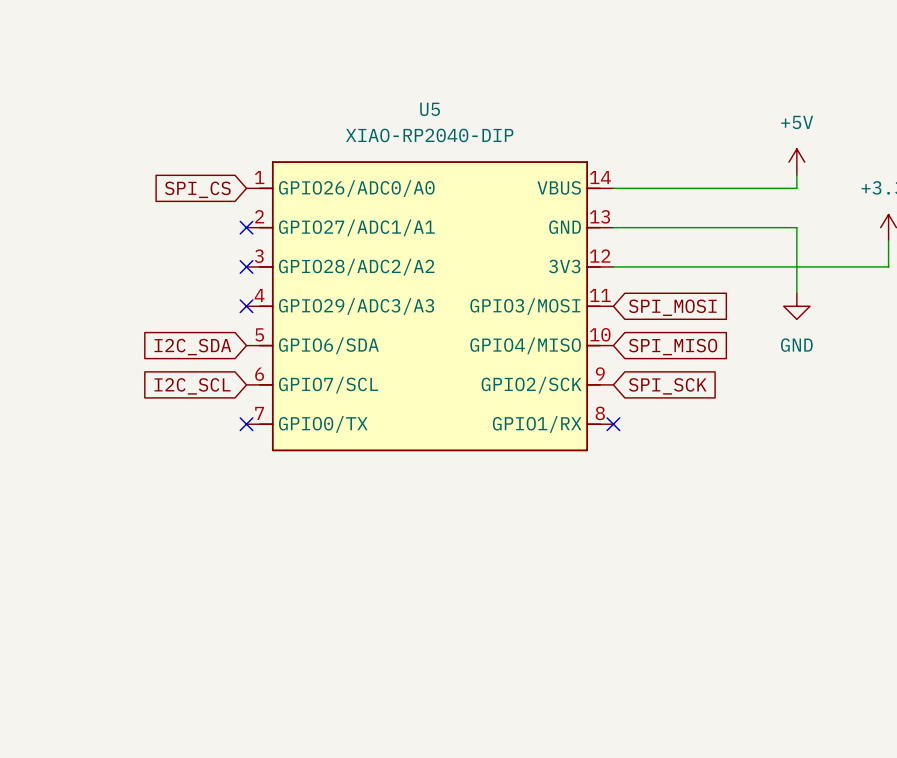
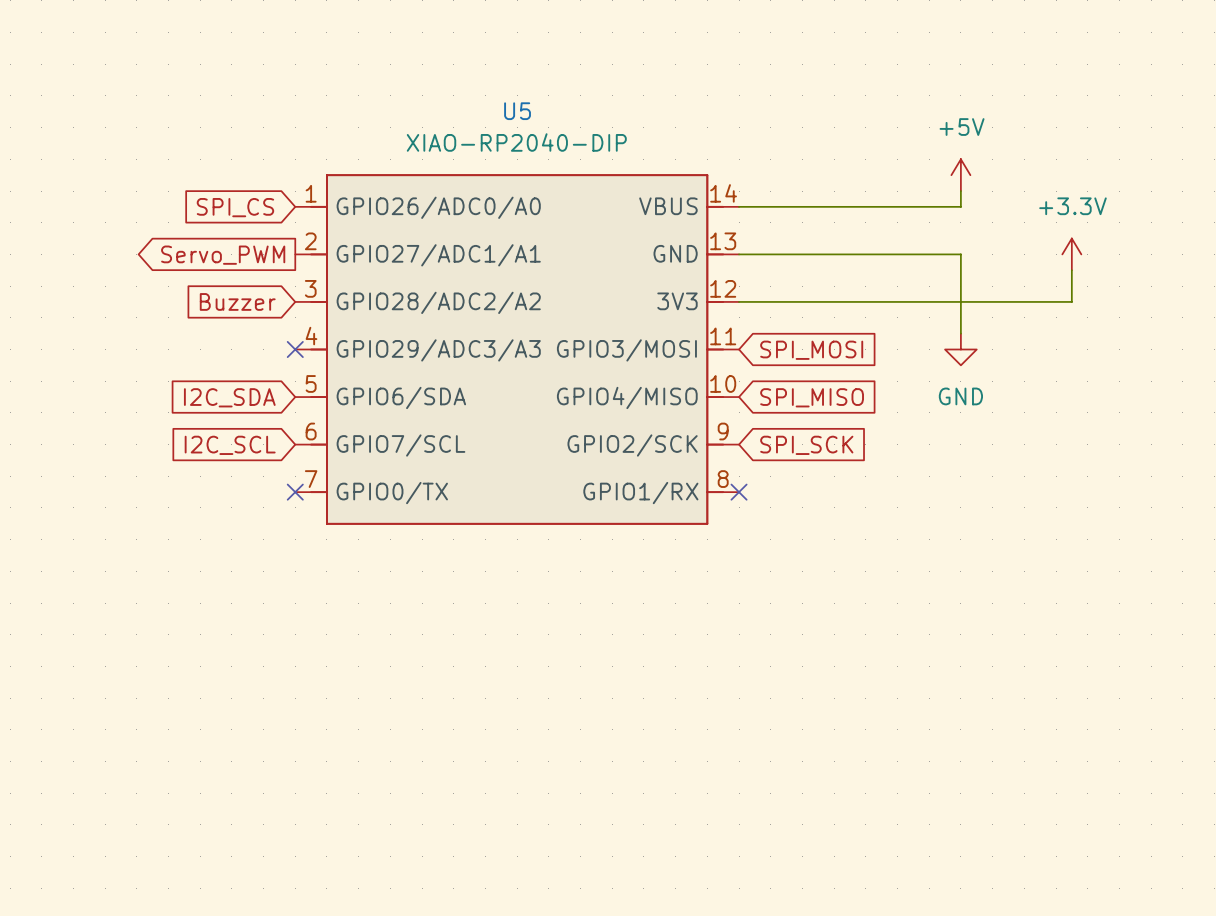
no-connect mark: (246, 227) -> none
global label: none -> Servo_PWM (223, 255)
no-connect mark: (246, 266) -> none
global label: none -> Buzzer (237, 301)

